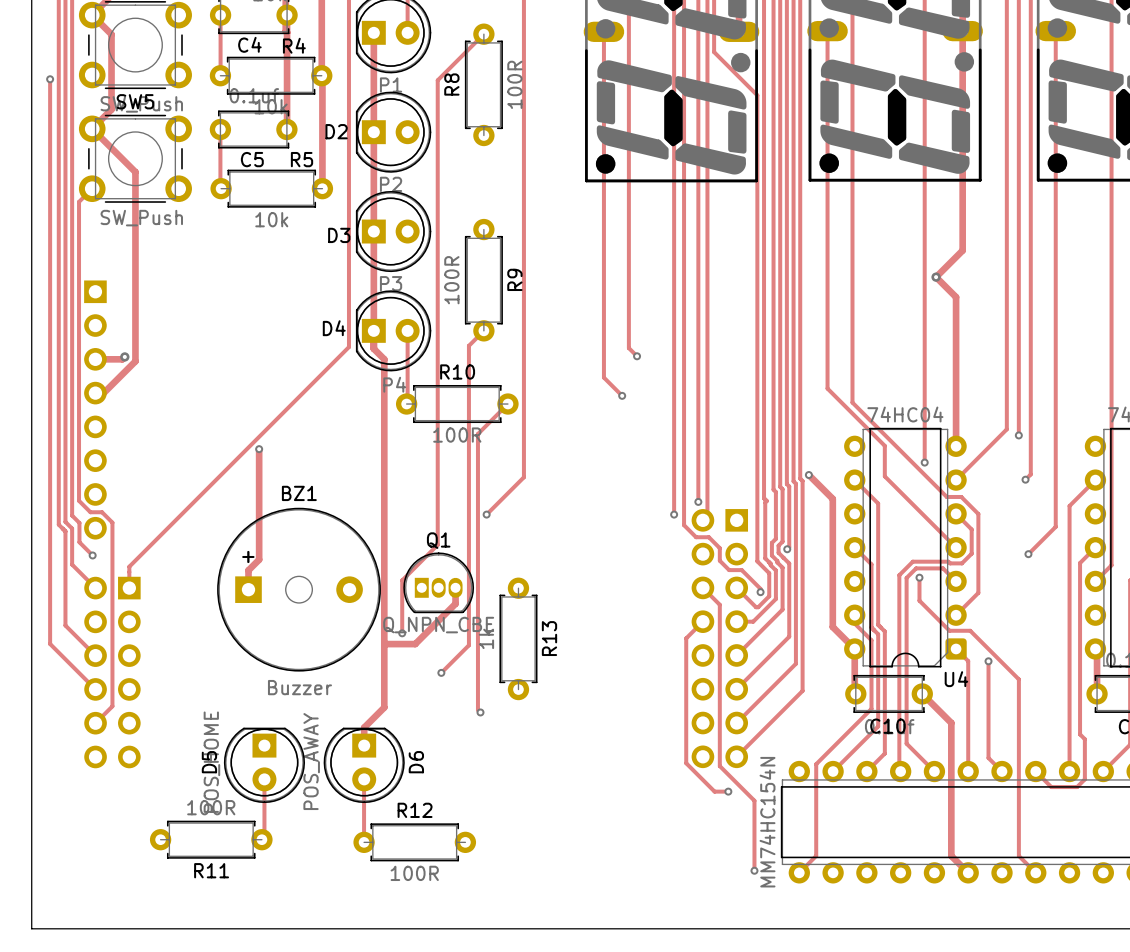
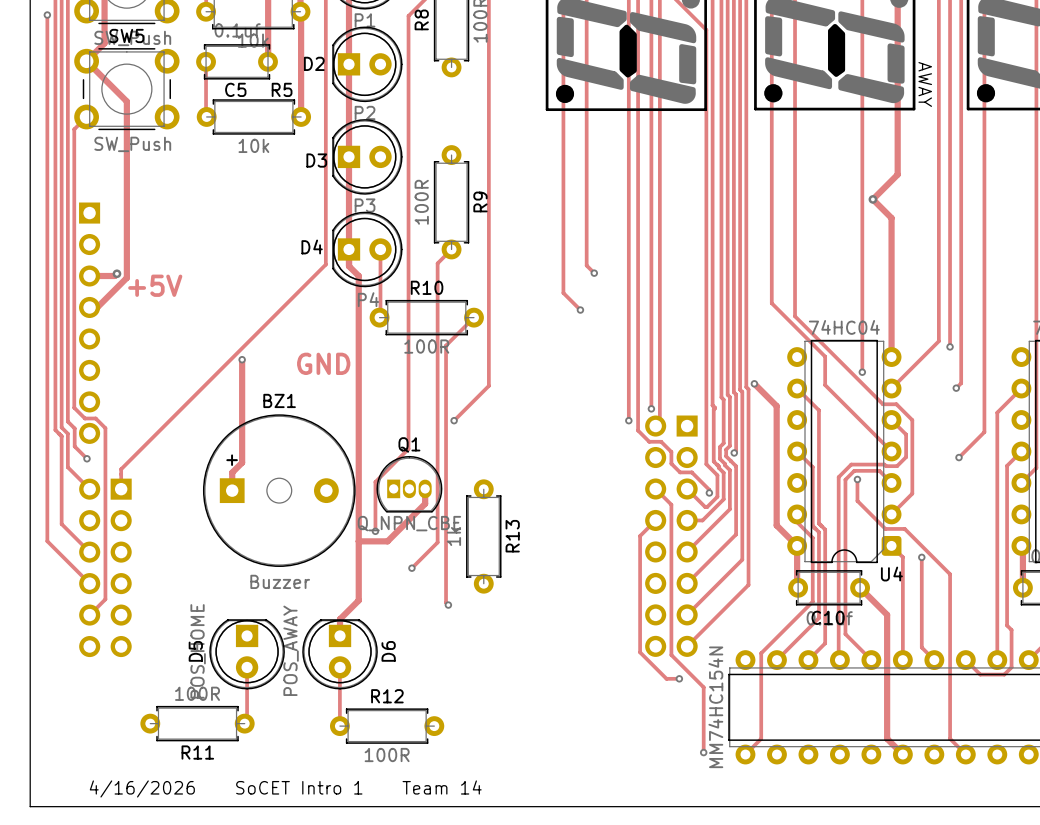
text: none -> AWAY (925, 84)
text: none -> +5V (155, 285)
text: none -> GND (323, 363)
text: none -> 4/16/2026 SoCET Intro 1 Team 14 (285, 788)

